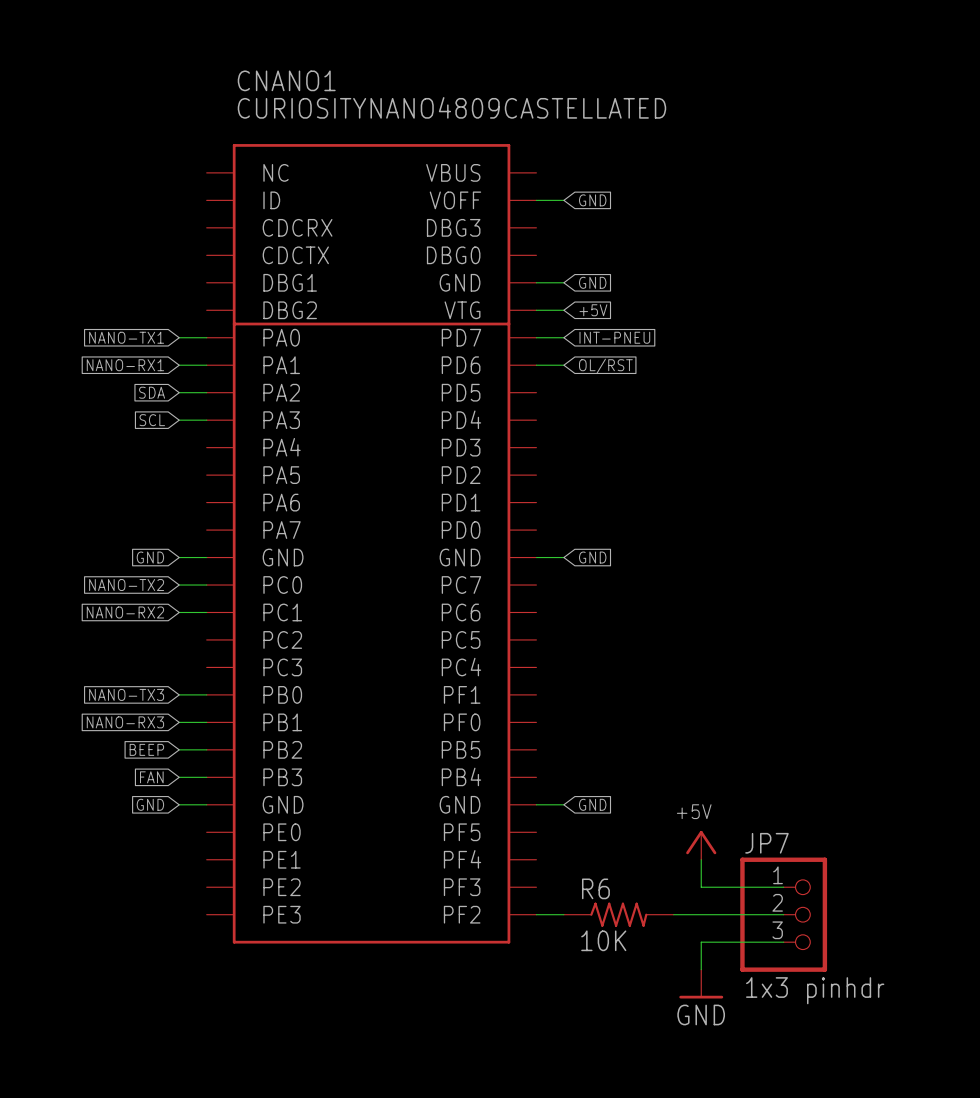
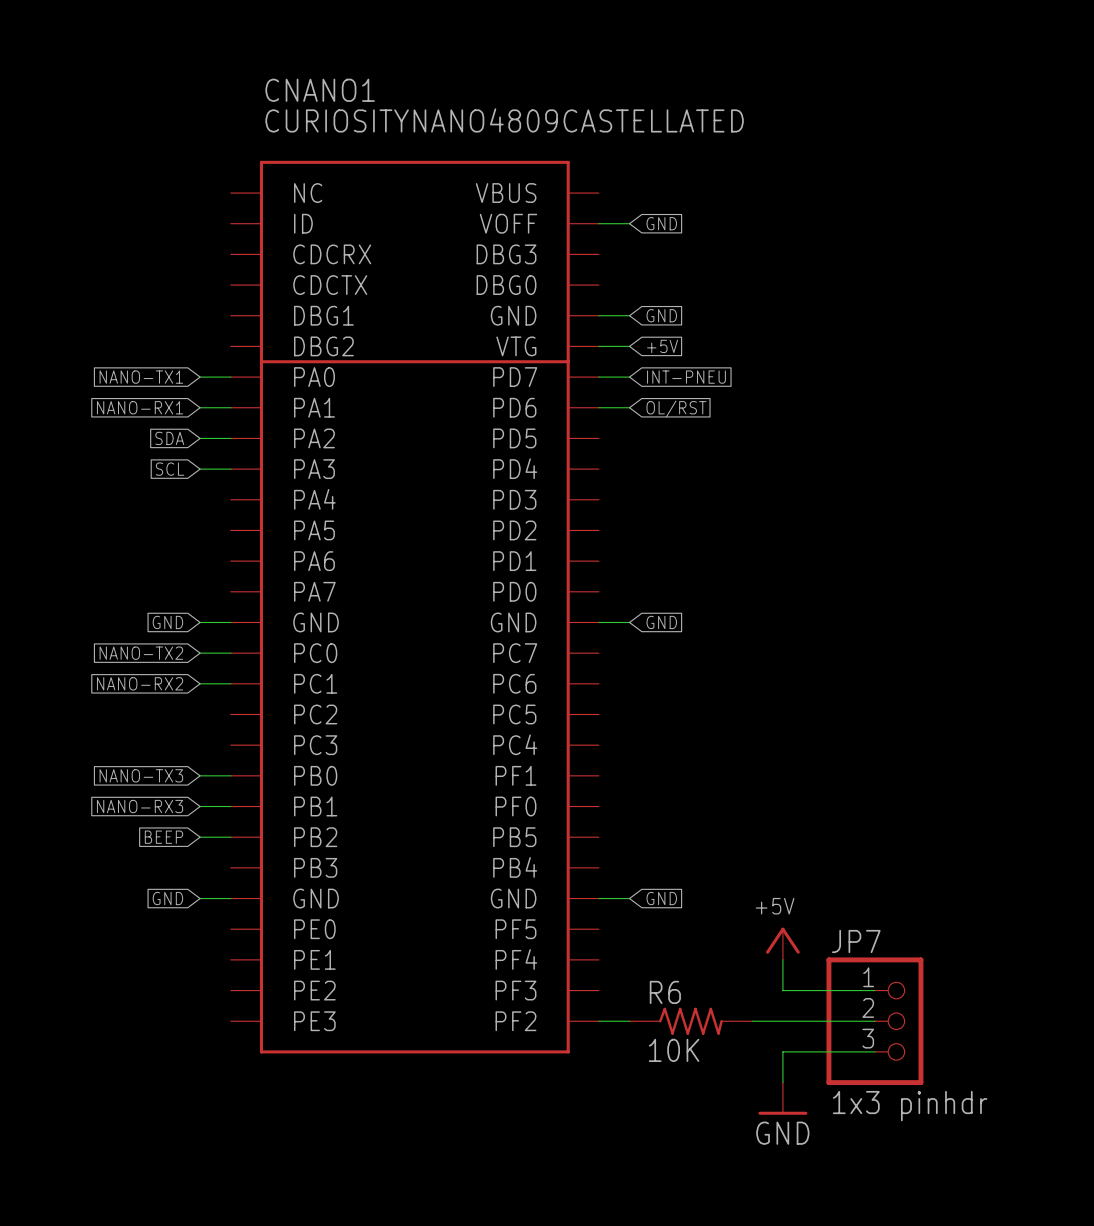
global label: FAN (151, 777) -> none
wire: (179, 777) (206, 777) -> none

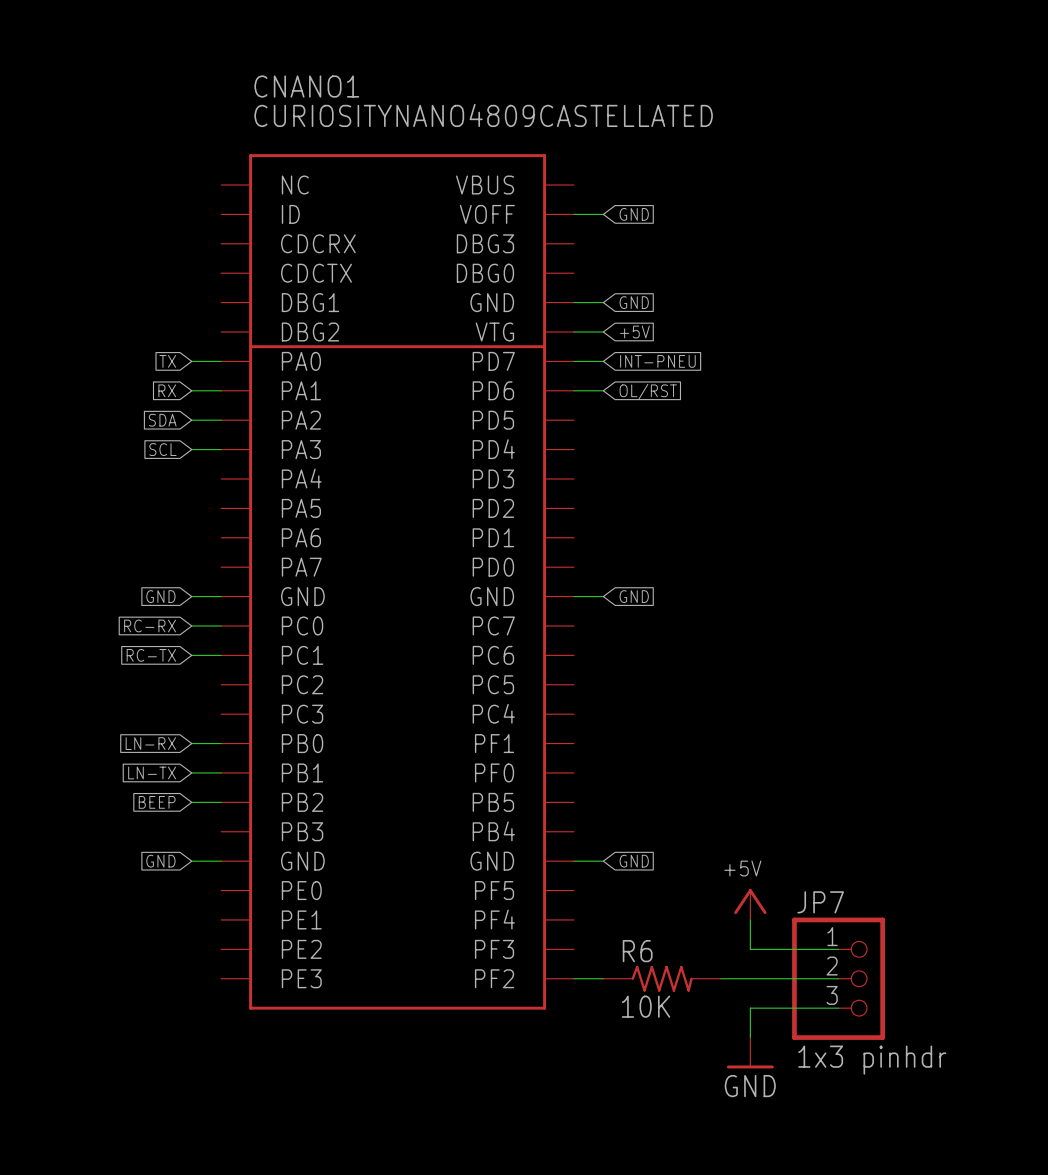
global label: NANO-TX1 (141, 377) -> TX (167, 361)
global label: NANO-RX1 (140, 407) -> RX (167, 390)
global label: NANO-TX2 (141, 653) -> RC-RX (150, 625)
global label: NANO-RX2 (140, 683) -> RC-TX (151, 655)
global label: NANO-TX3 (141, 775) -> LN-RX (150, 743)
global label: NANO-RX3 (140, 806) -> LN-TX (152, 772)

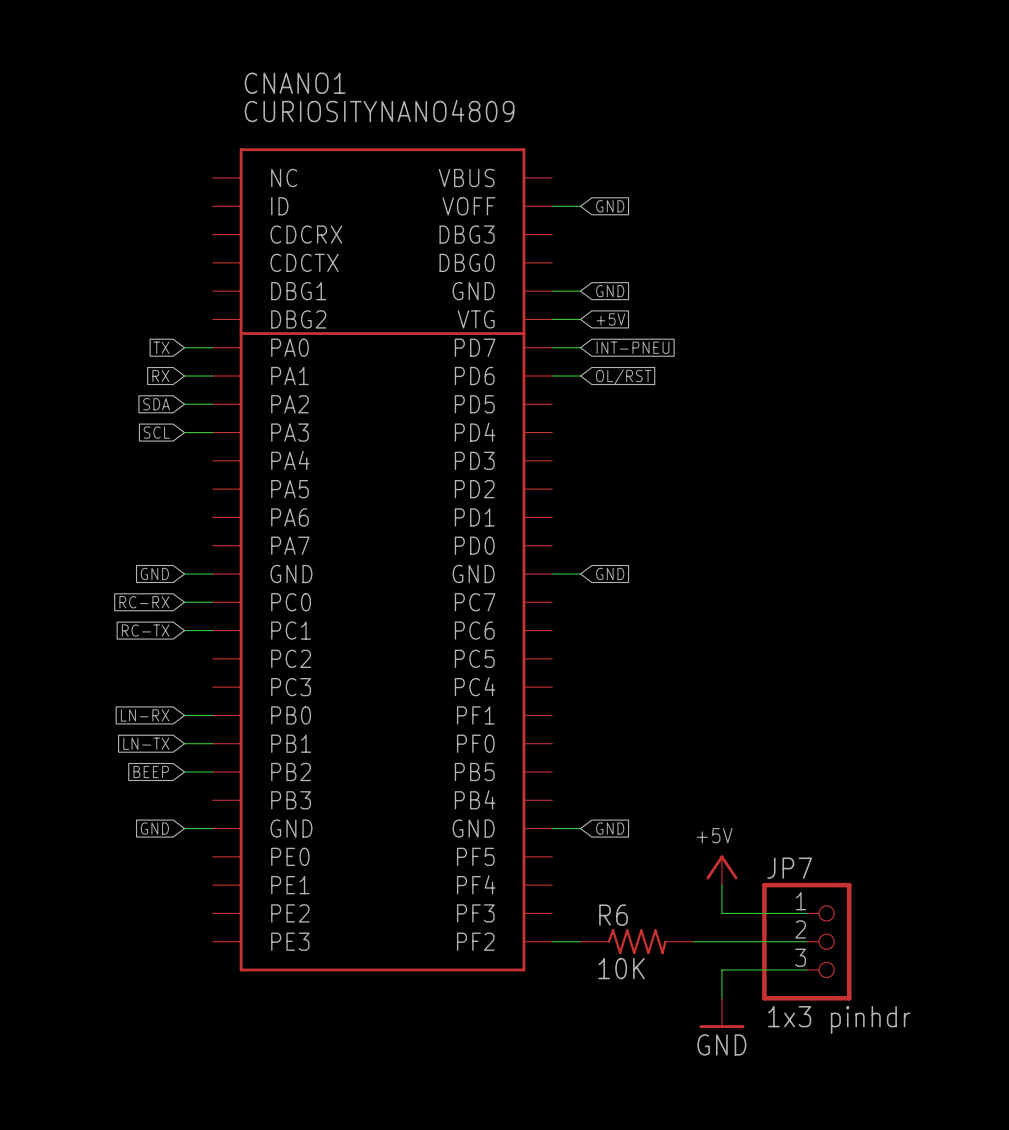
CNANO1 value: CURIOSITYNANO4809CASTELLATED (483, 115) -> CURIOSITYNANO4809 (379, 111)

